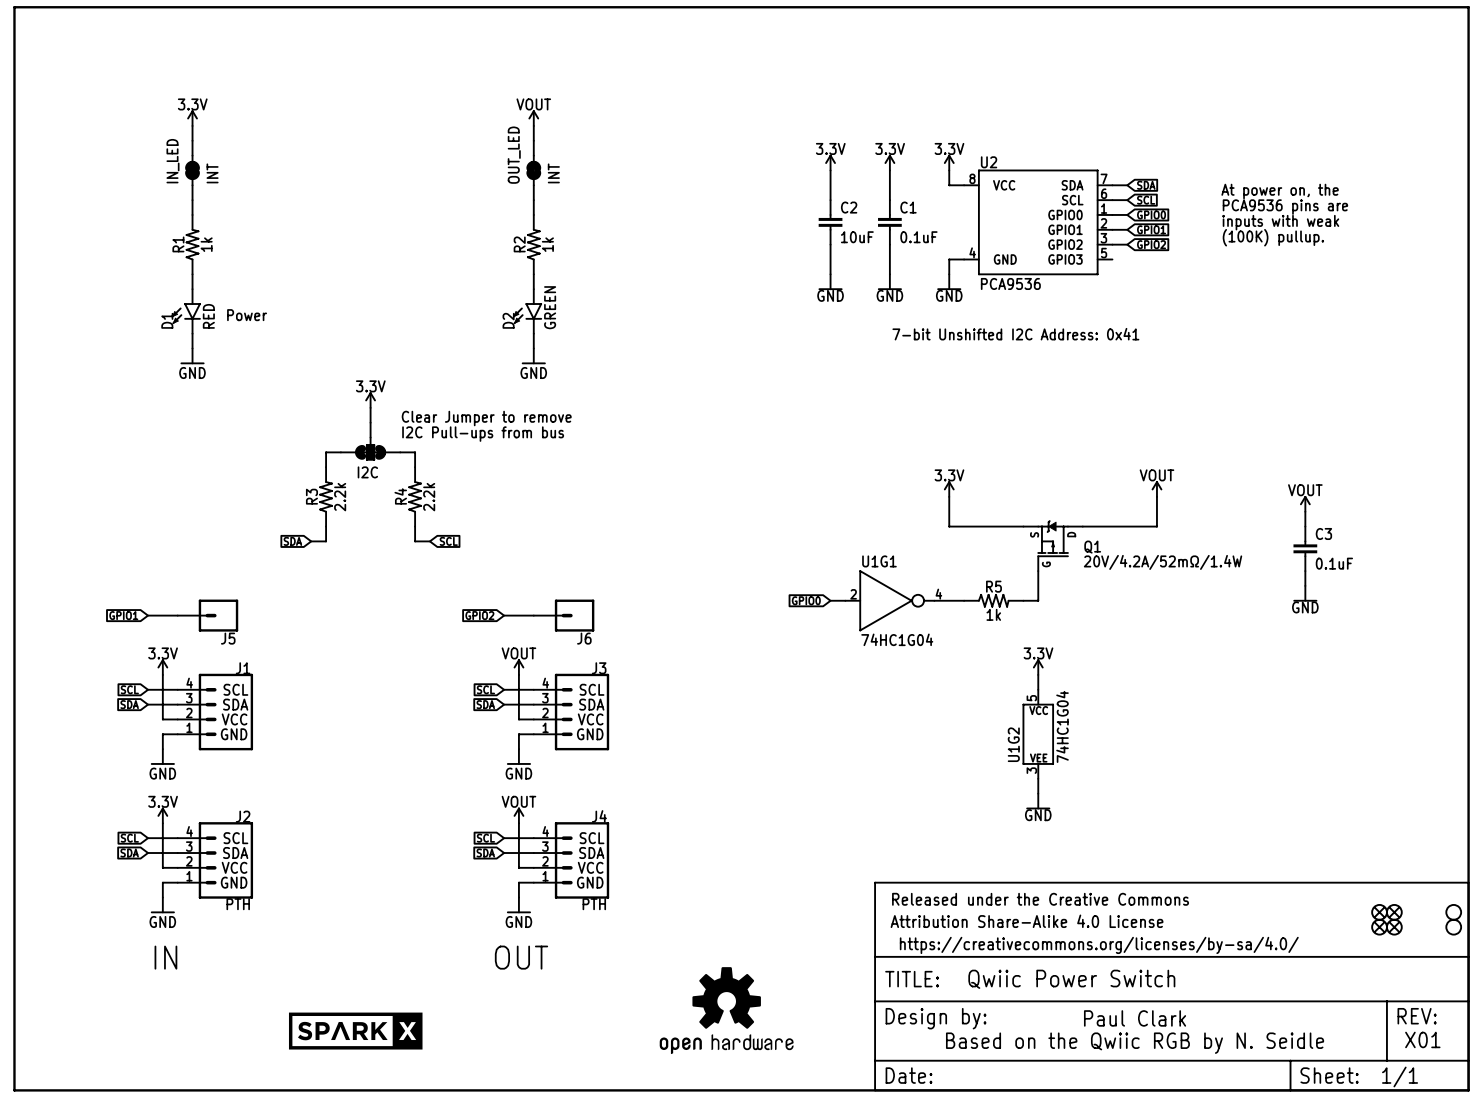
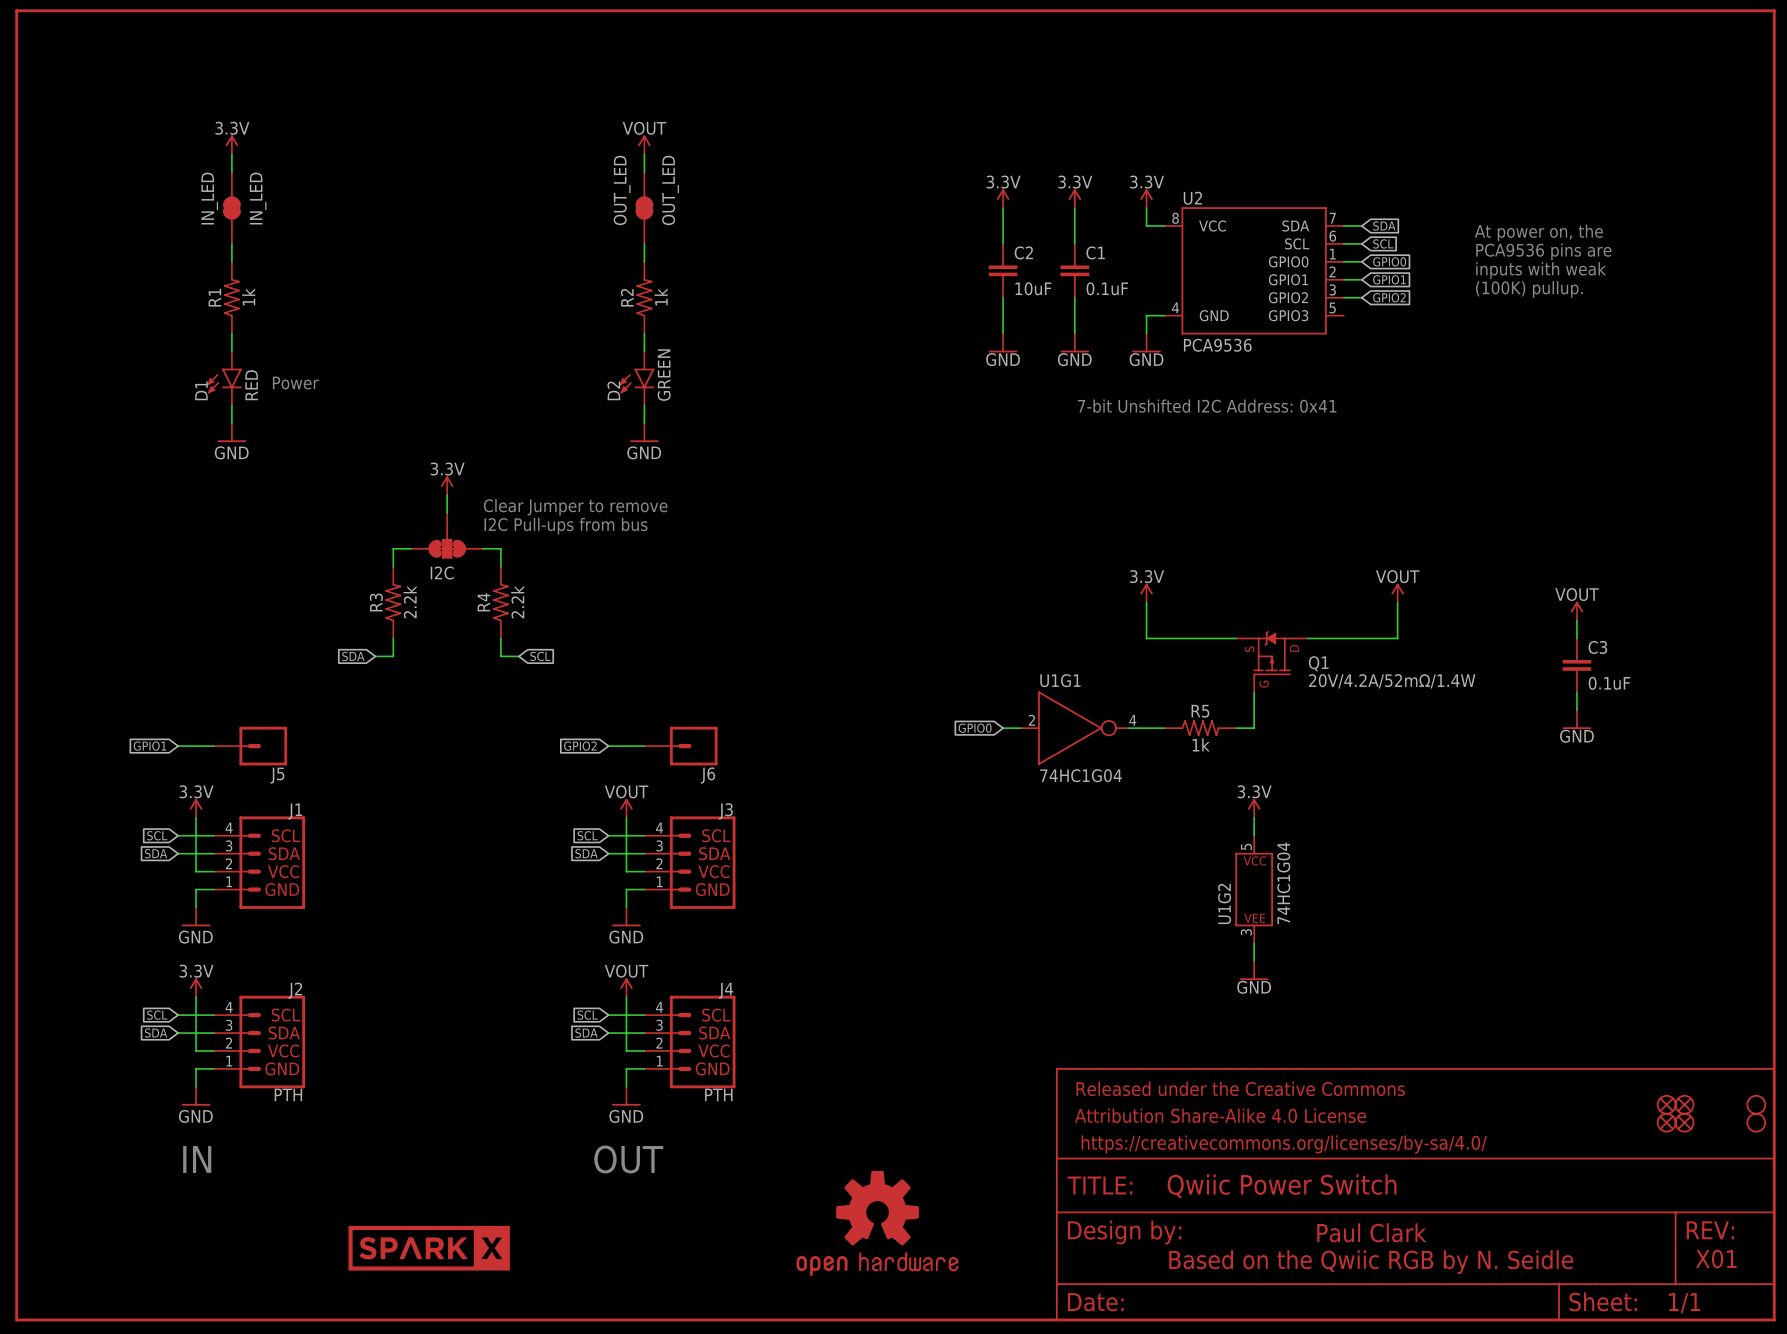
IN_LED value: INT (212, 173) -> IN_LED (258, 198)
OUT_LED value: INT (553, 173) -> OUT_LED (670, 190)

